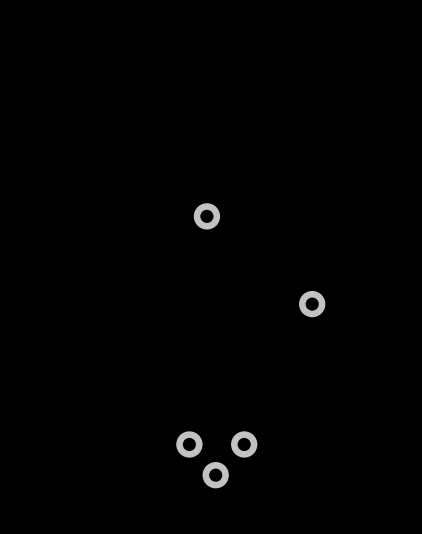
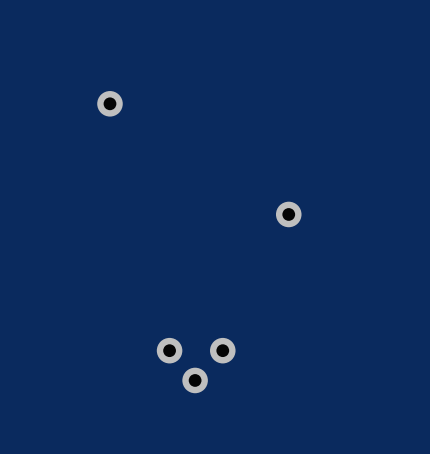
via position: (206, 216) -> (109, 103)

